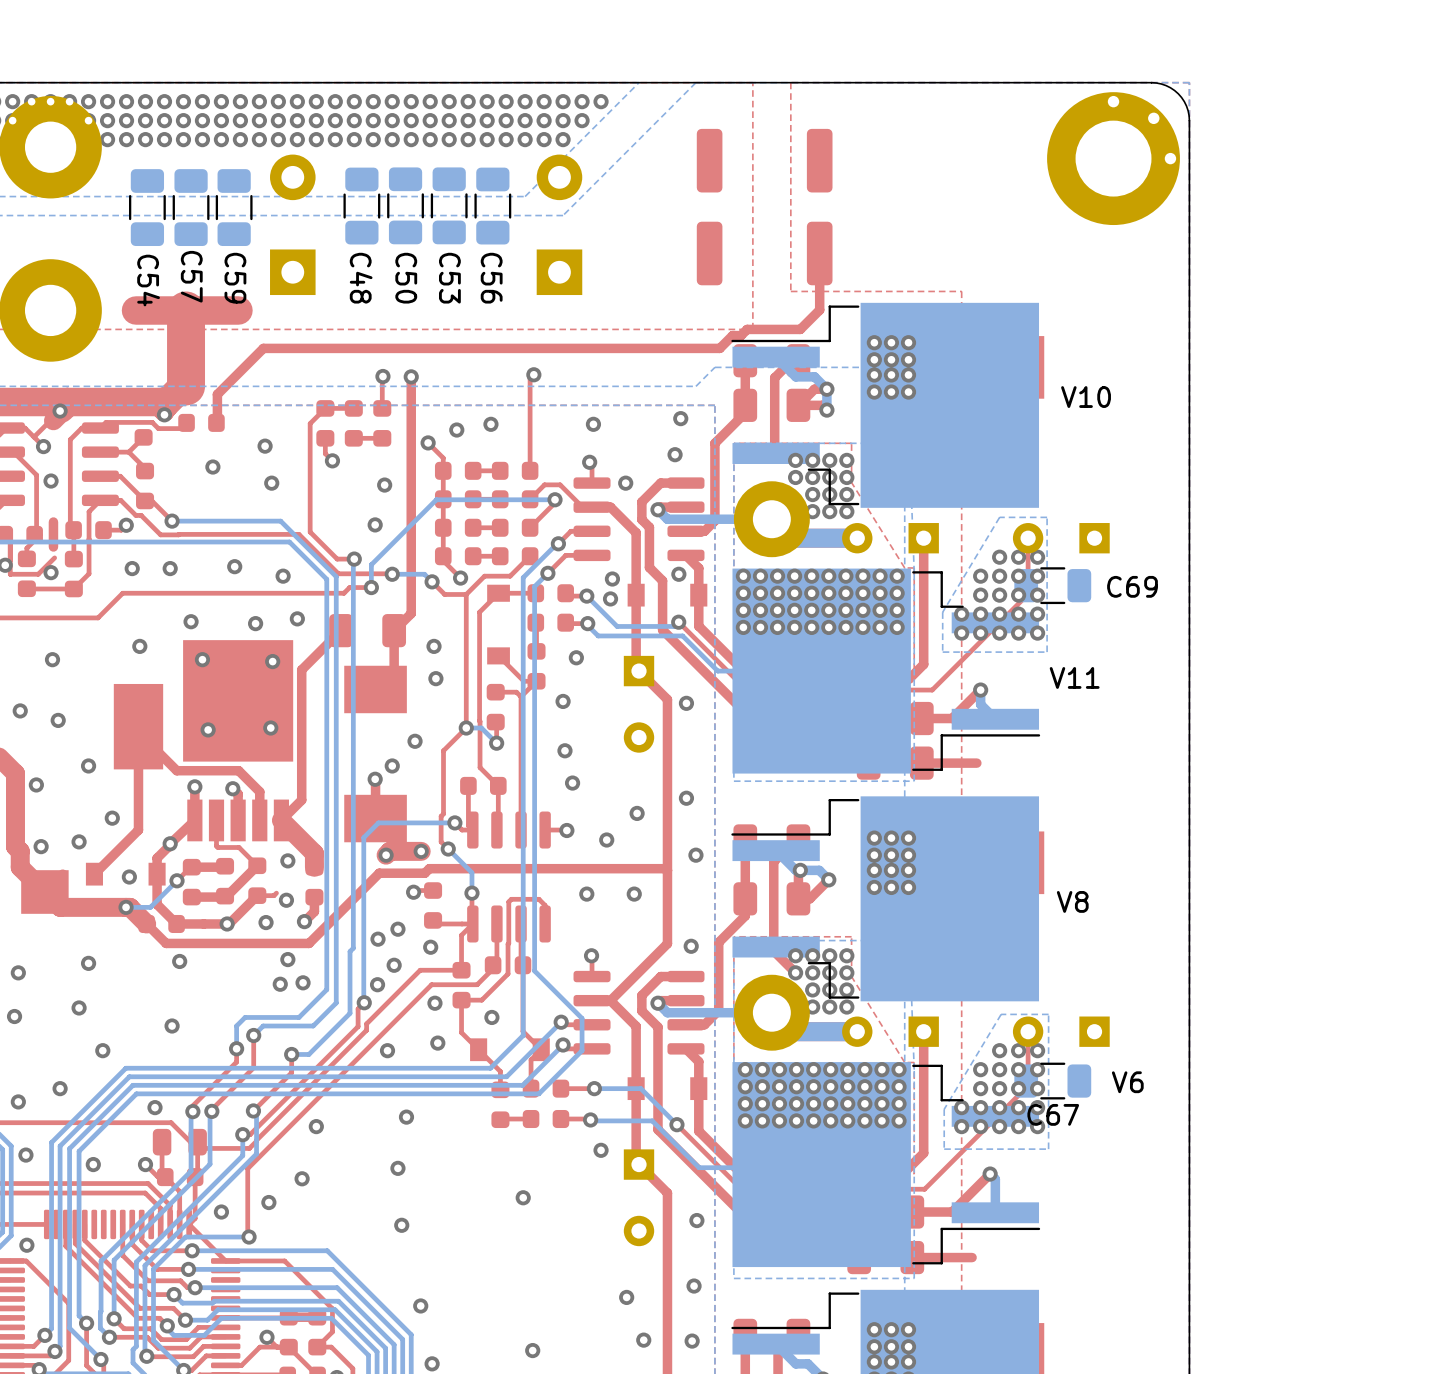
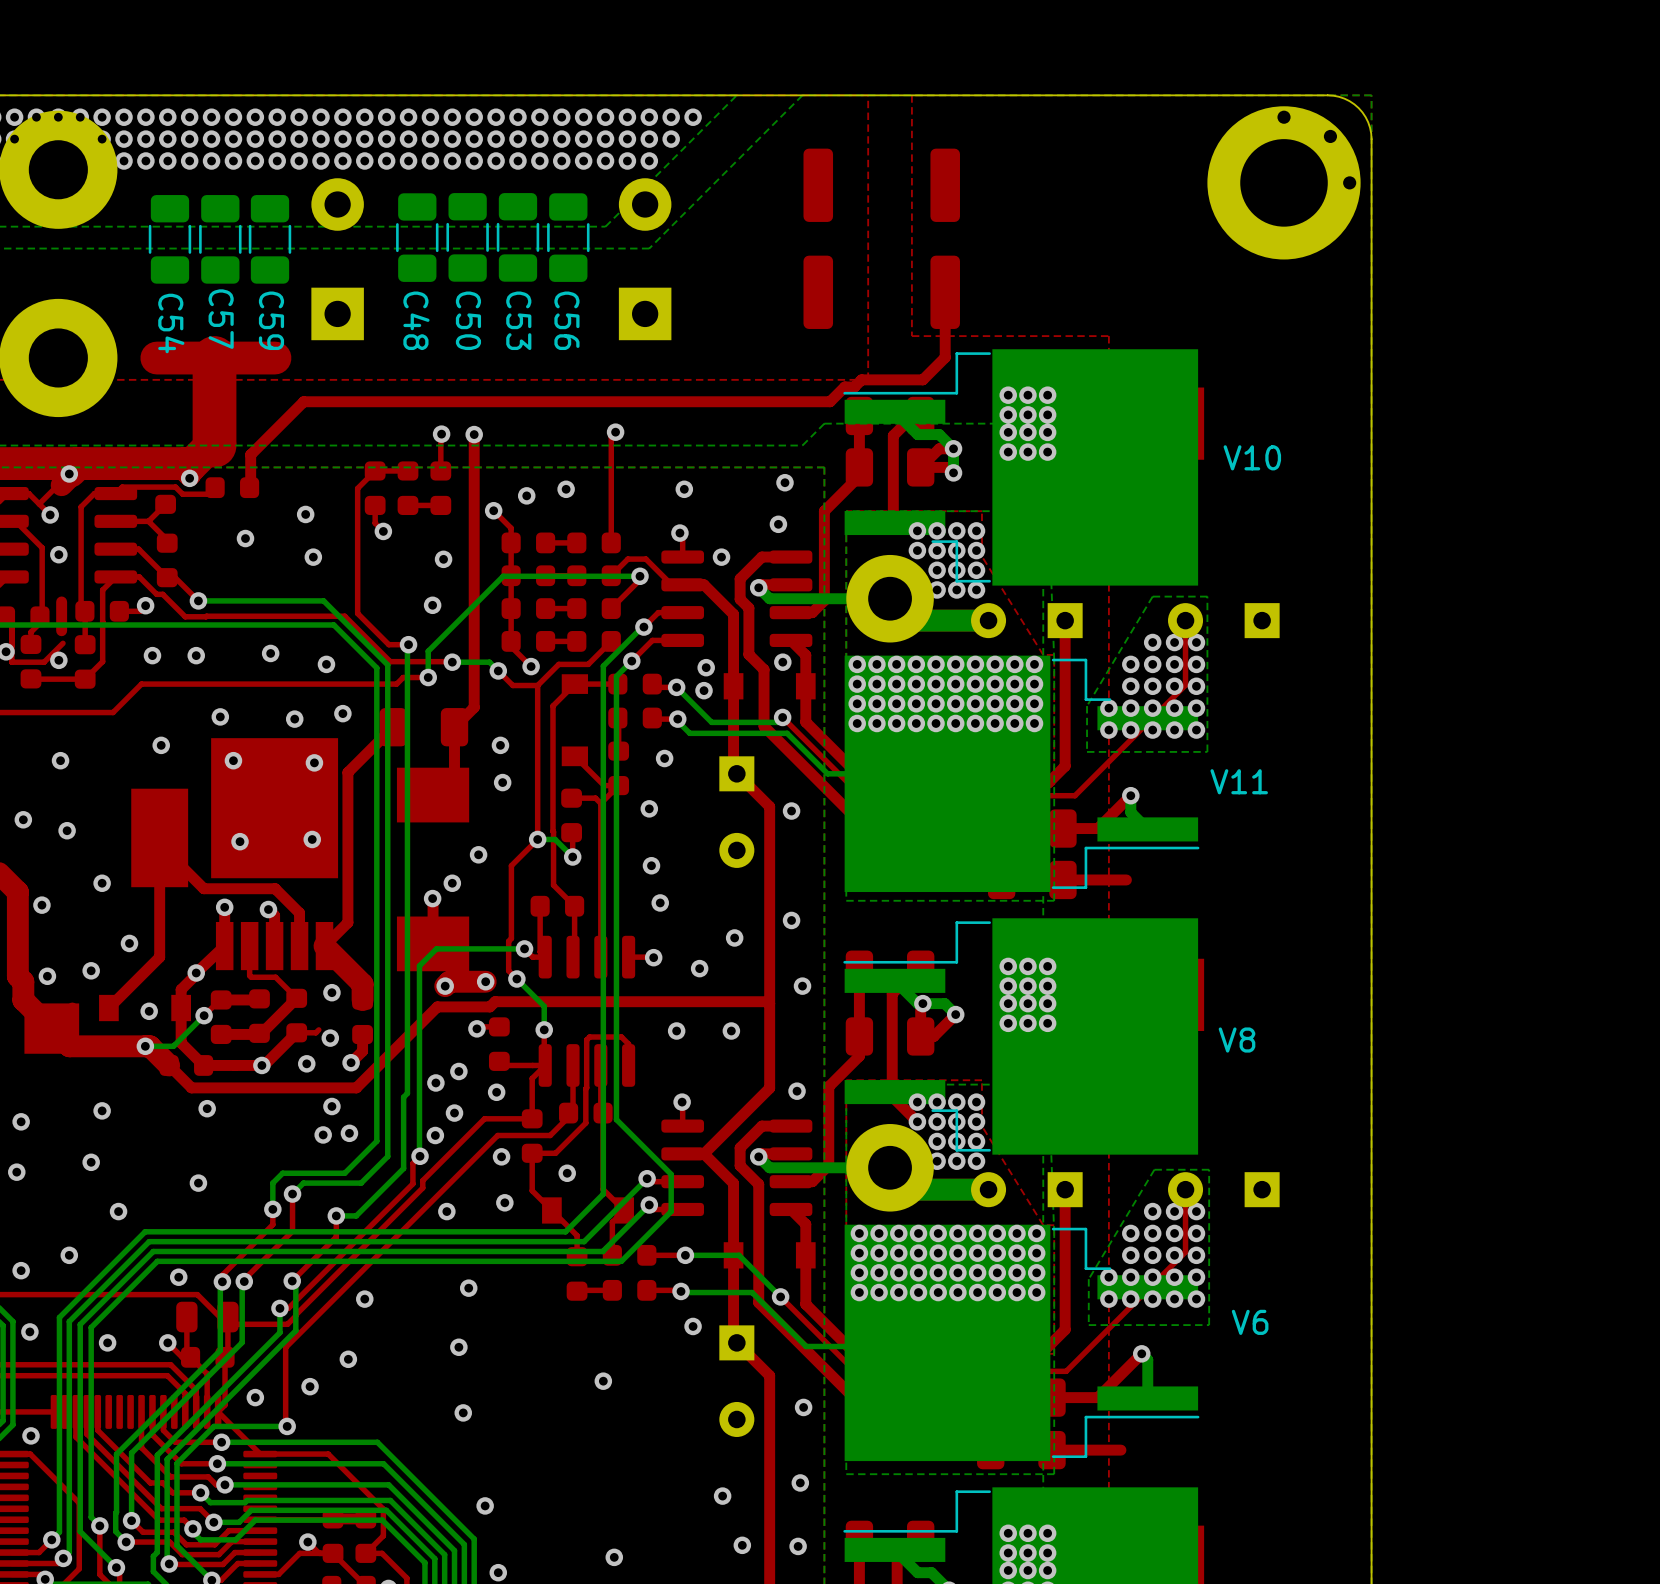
C69: (1052, 585) -> none
C67: (1052, 1081) -> none
V6 name position: V6 (1127, 1082) -> V6 (1250, 1322)

